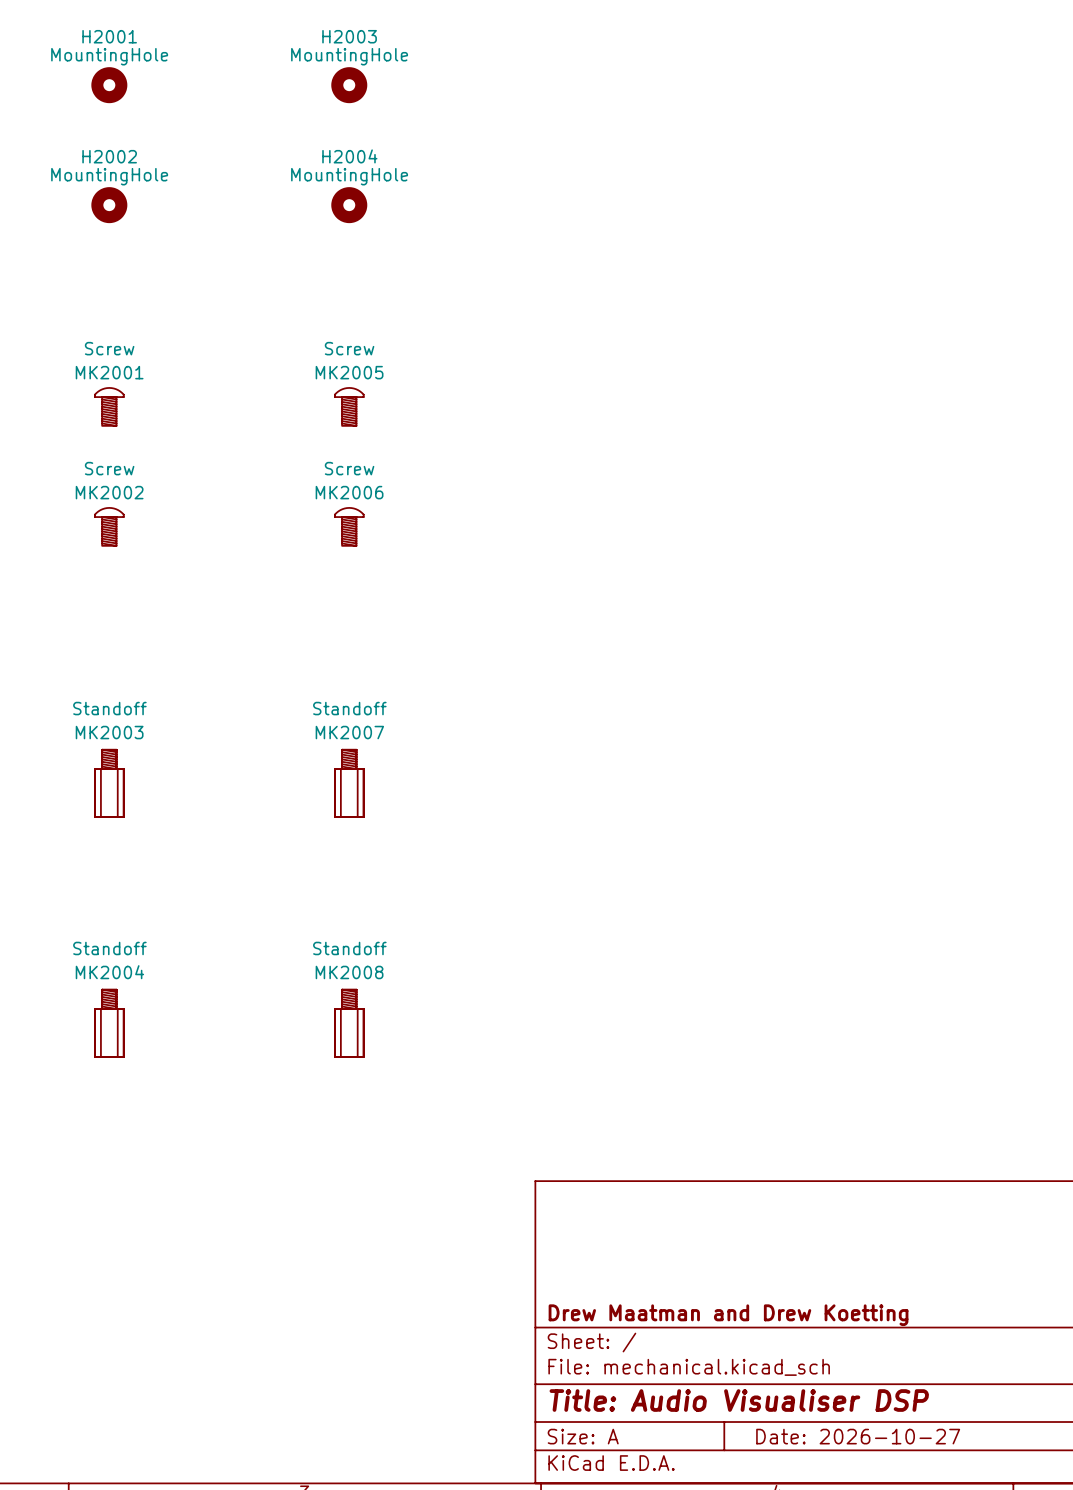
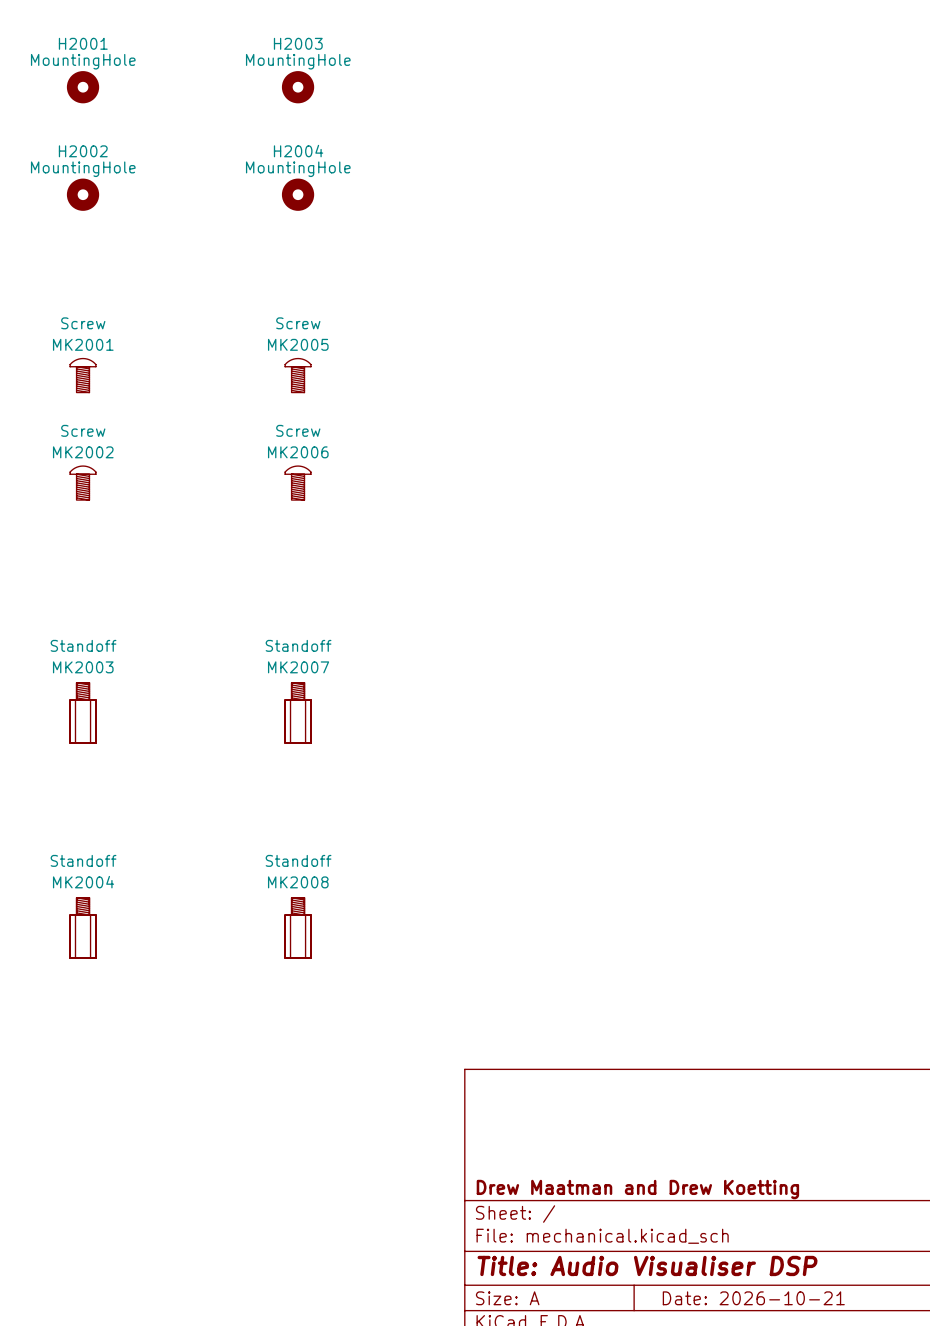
title block: Date: 2026-10-27 (858, 1436) -> Date: 2026-10-21 (753, 1298)

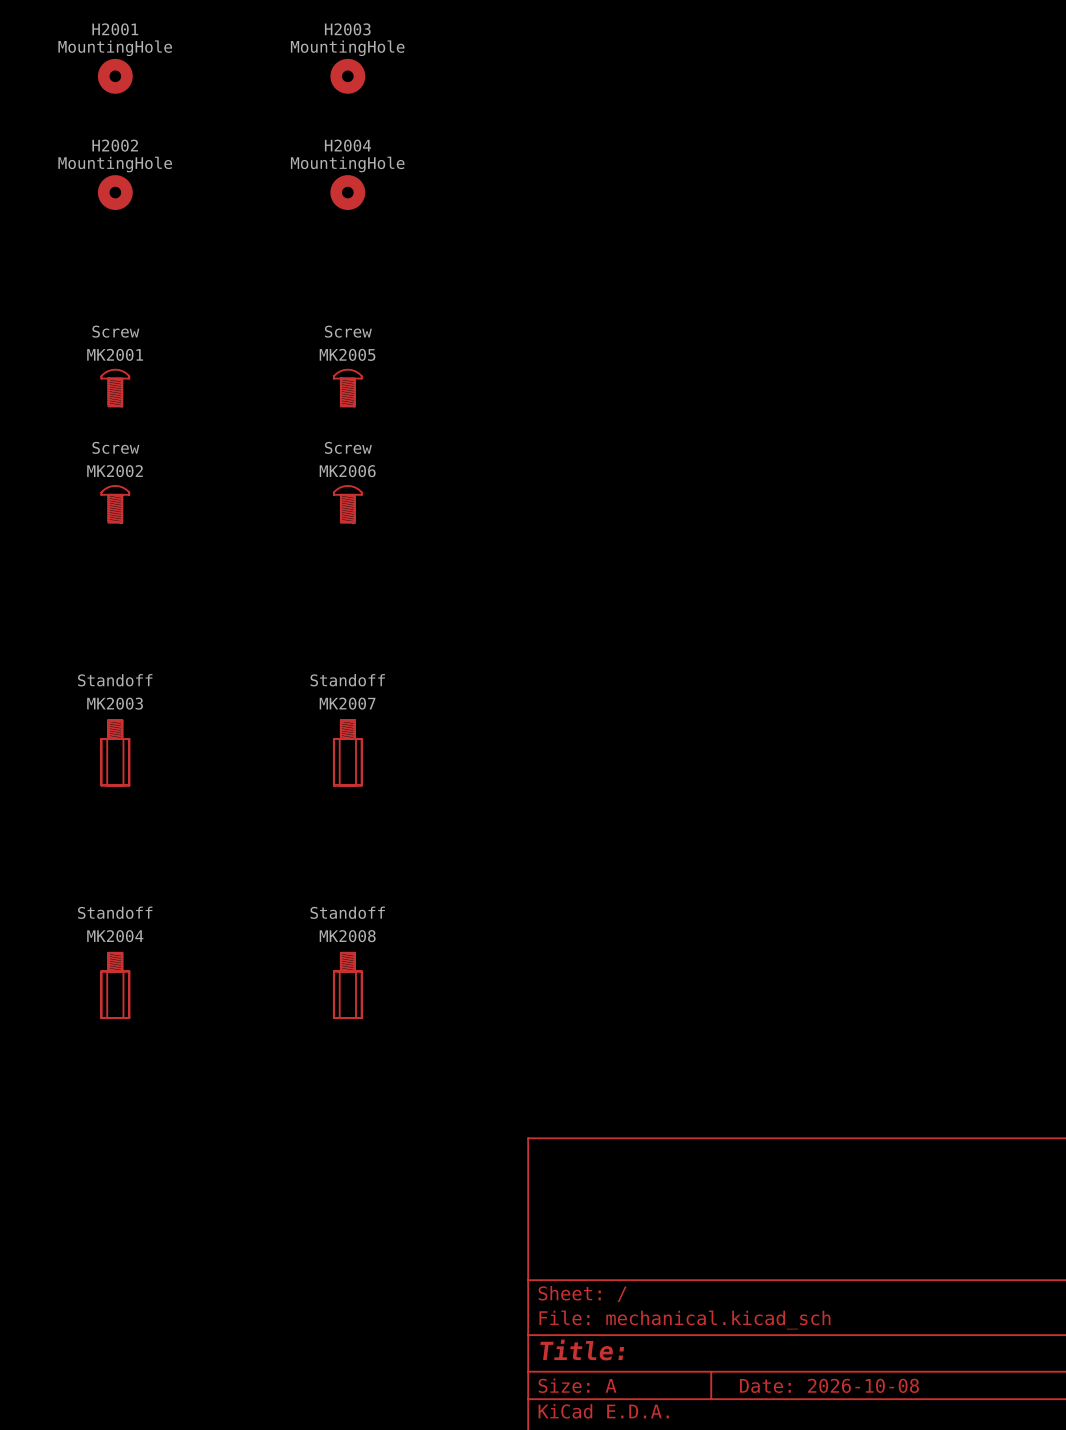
title block: Drew Maatman and Drew Koetting (637, 1189) -> none
title block: Title: Audio Visualiser DSP (647, 1265) -> Title: (582, 1350)
title block: Date: 2026-10-21 (753, 1298) -> Date: 2026-10-08 (829, 1385)

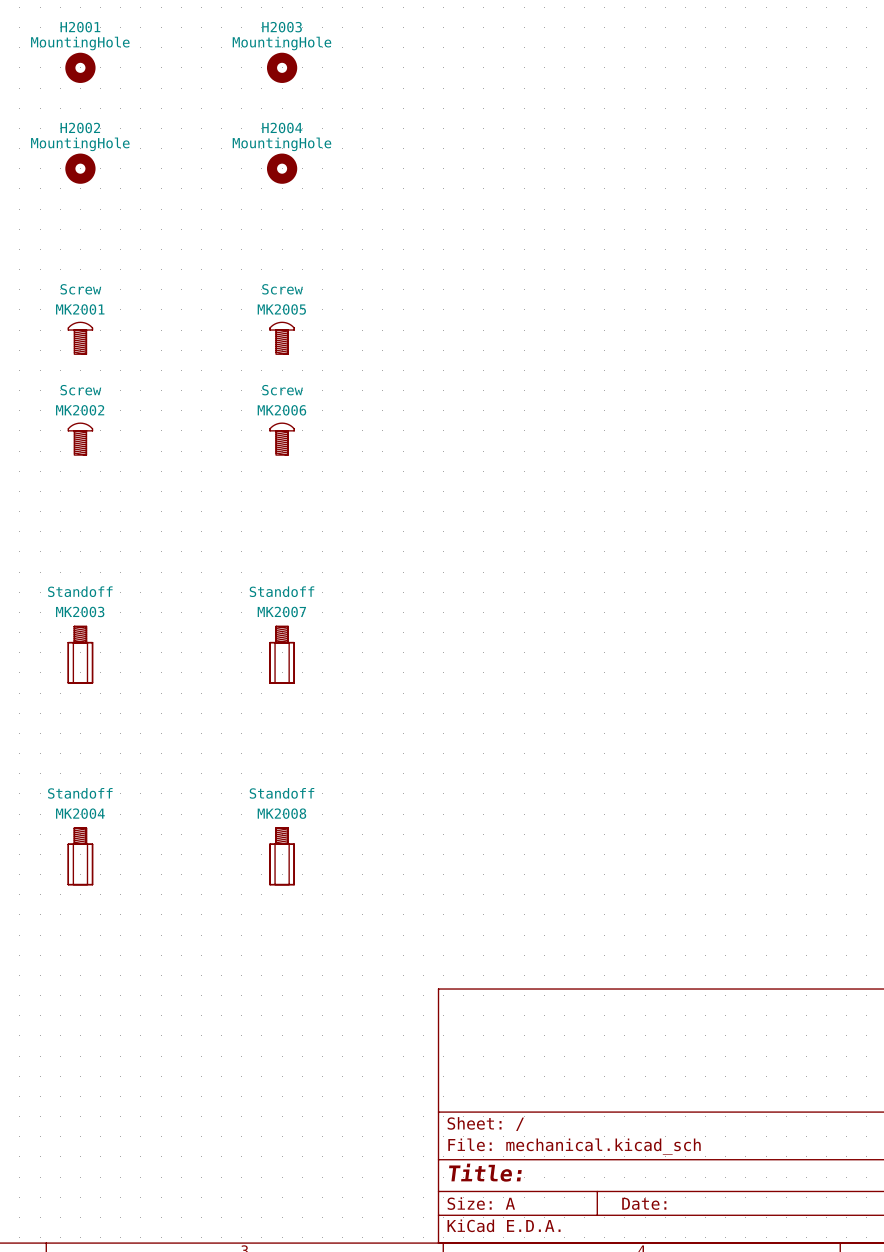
title block: Date: 2026-10-08 (829, 1385) -> Date: (644, 1203)

